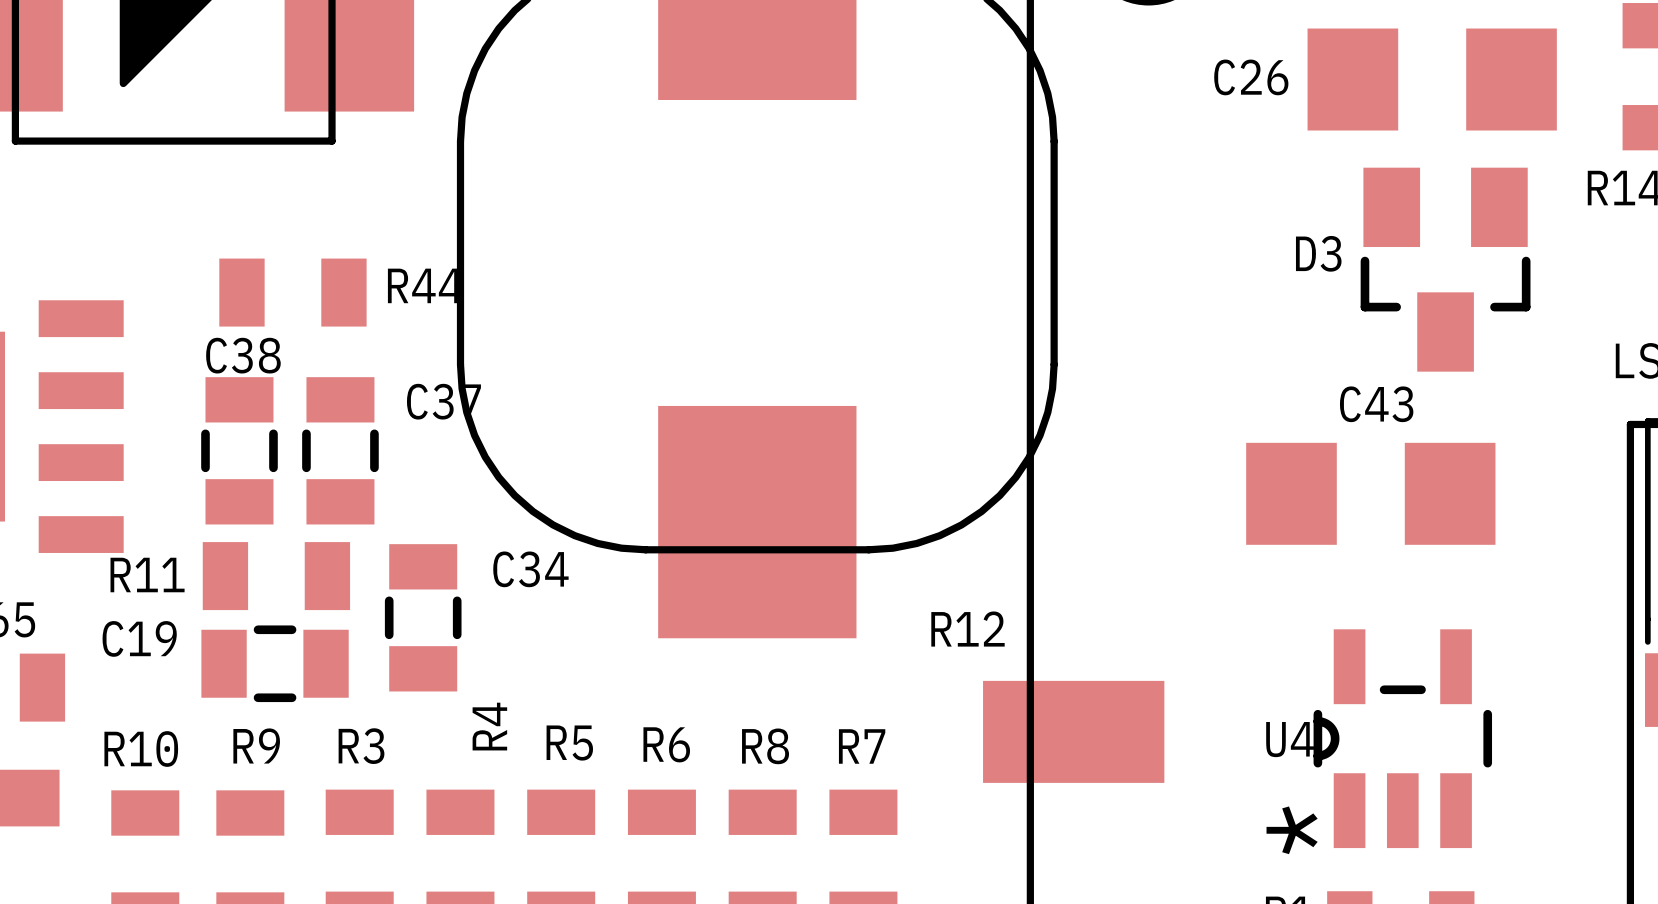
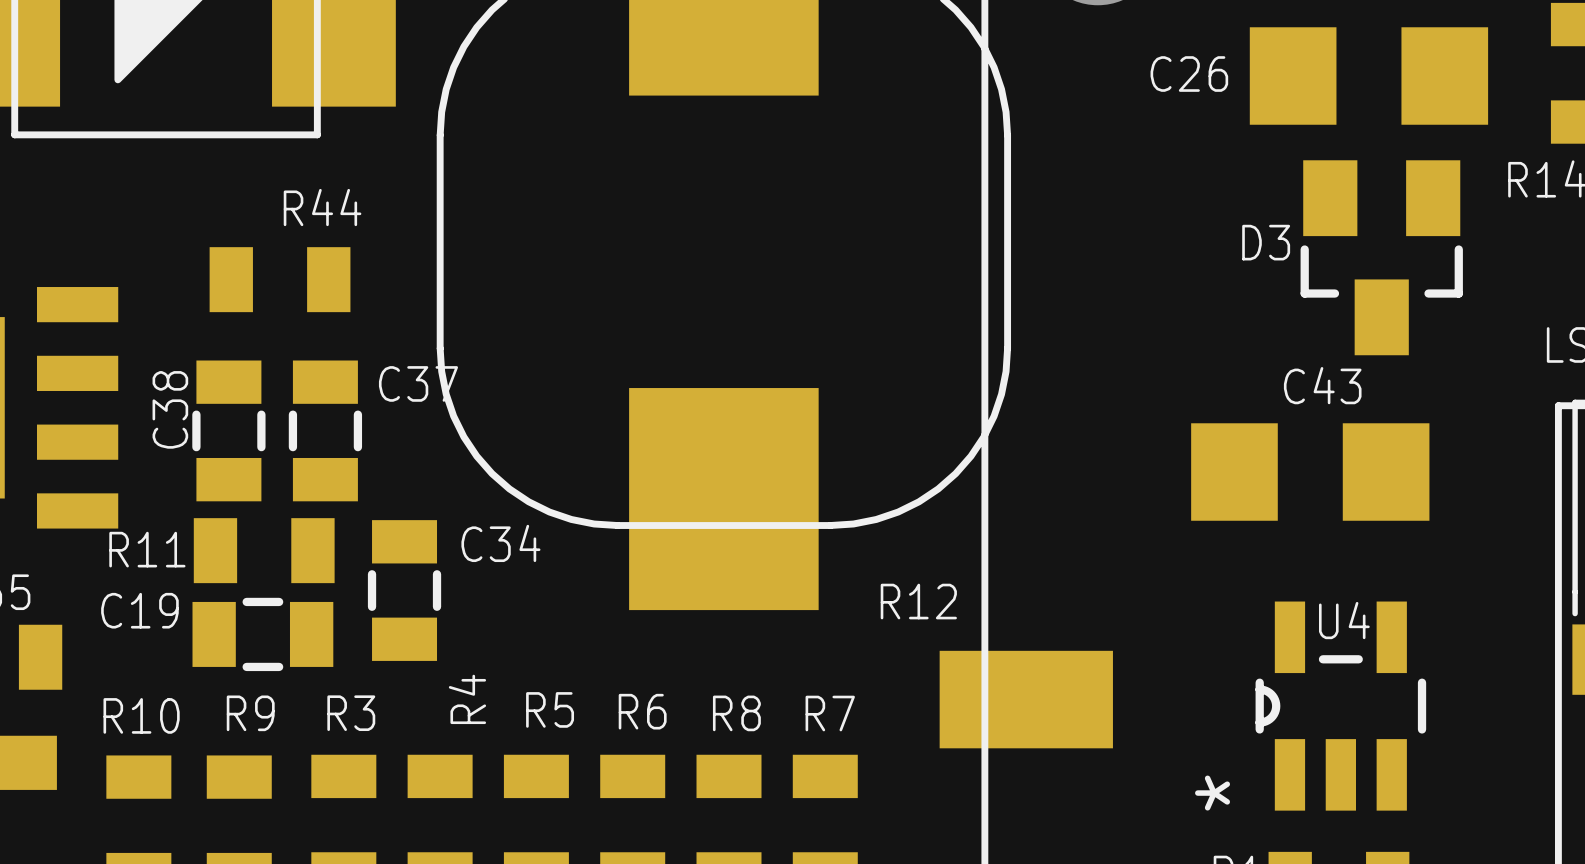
R44 name position: R44 (425, 285) -> R44 (322, 207)
C38 name rotation: 0° (243, 355) -> 90° counterclockwise (170, 409)
C38 name position: C38 (243, 355) -> C38 (170, 409)
U4 name position: U4 (1290, 739) -> U4 (1344, 620)

